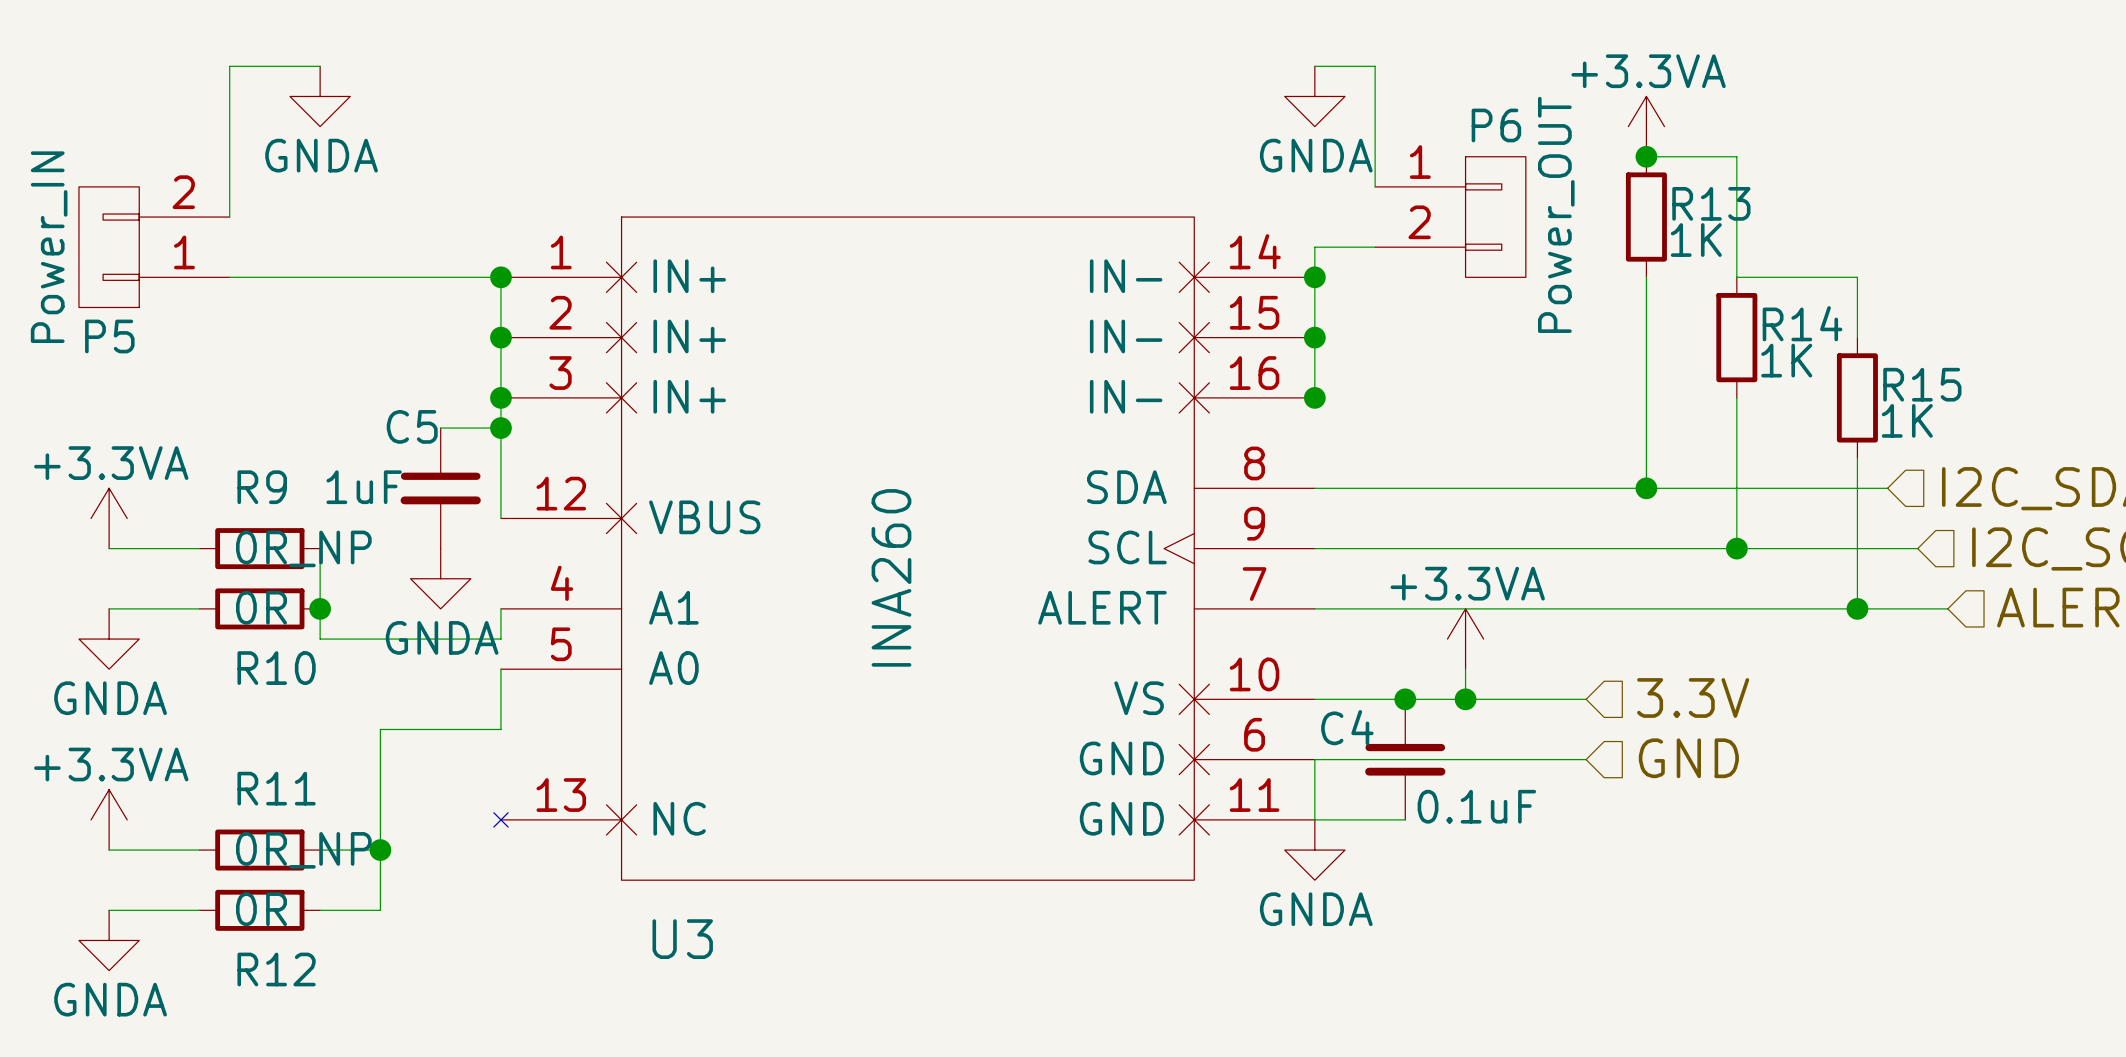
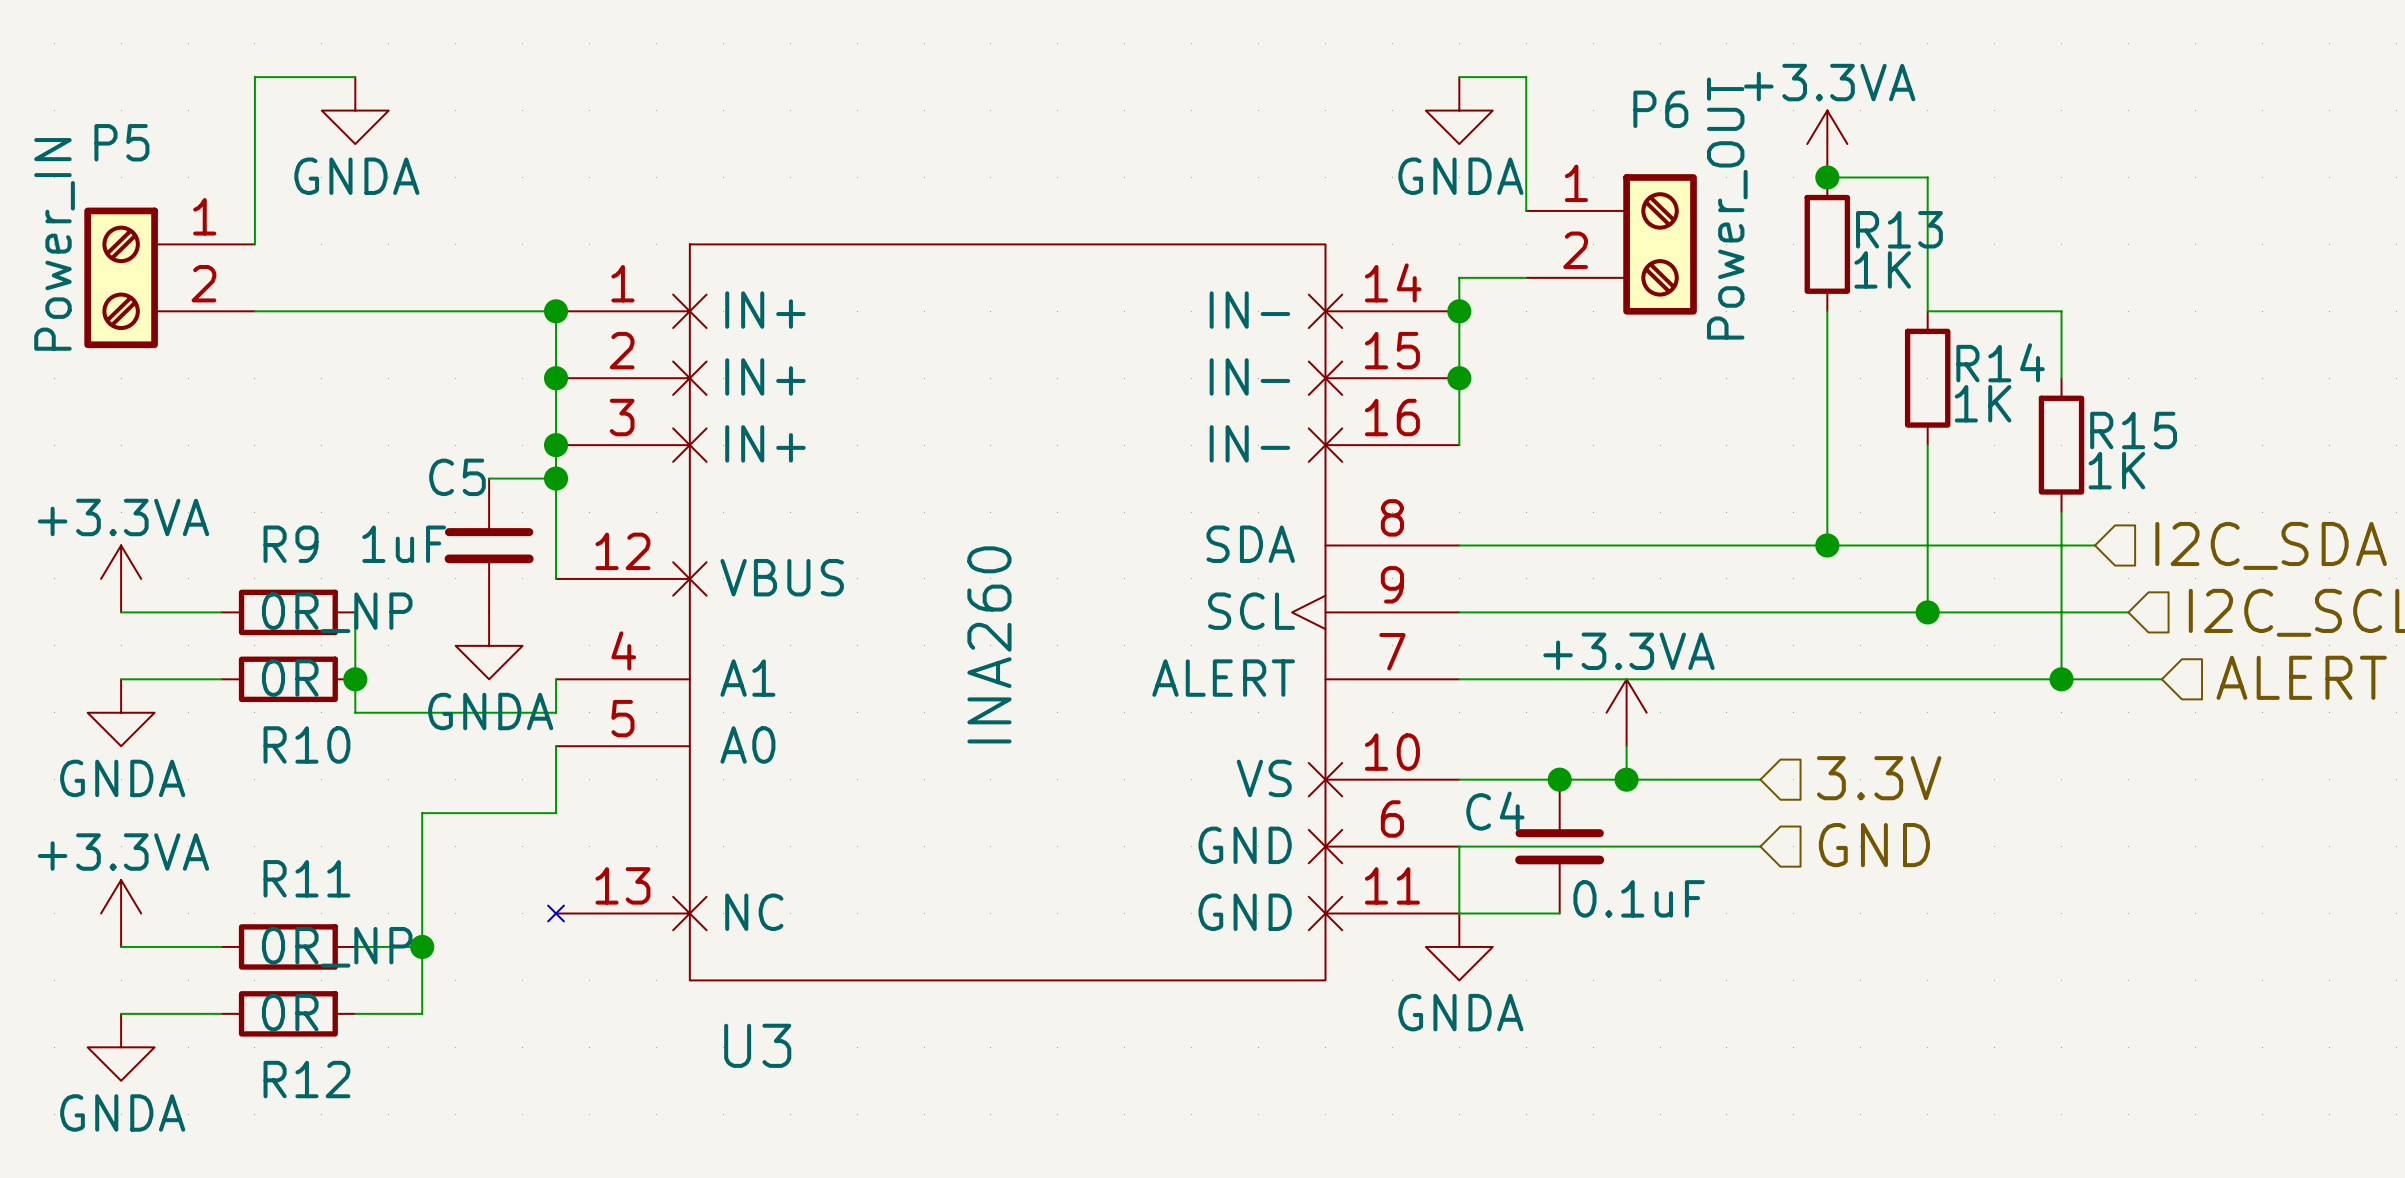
P6 symbol: [1375, 156, 1526, 278] -> [1526, 174, 1697, 315]
P5 symbol: [78, 186, 230, 308] -> [84, 207, 255, 349]
P5 name position: P5 (109, 336) -> P5 (121, 142)
junction: (1314, 397) -> none

